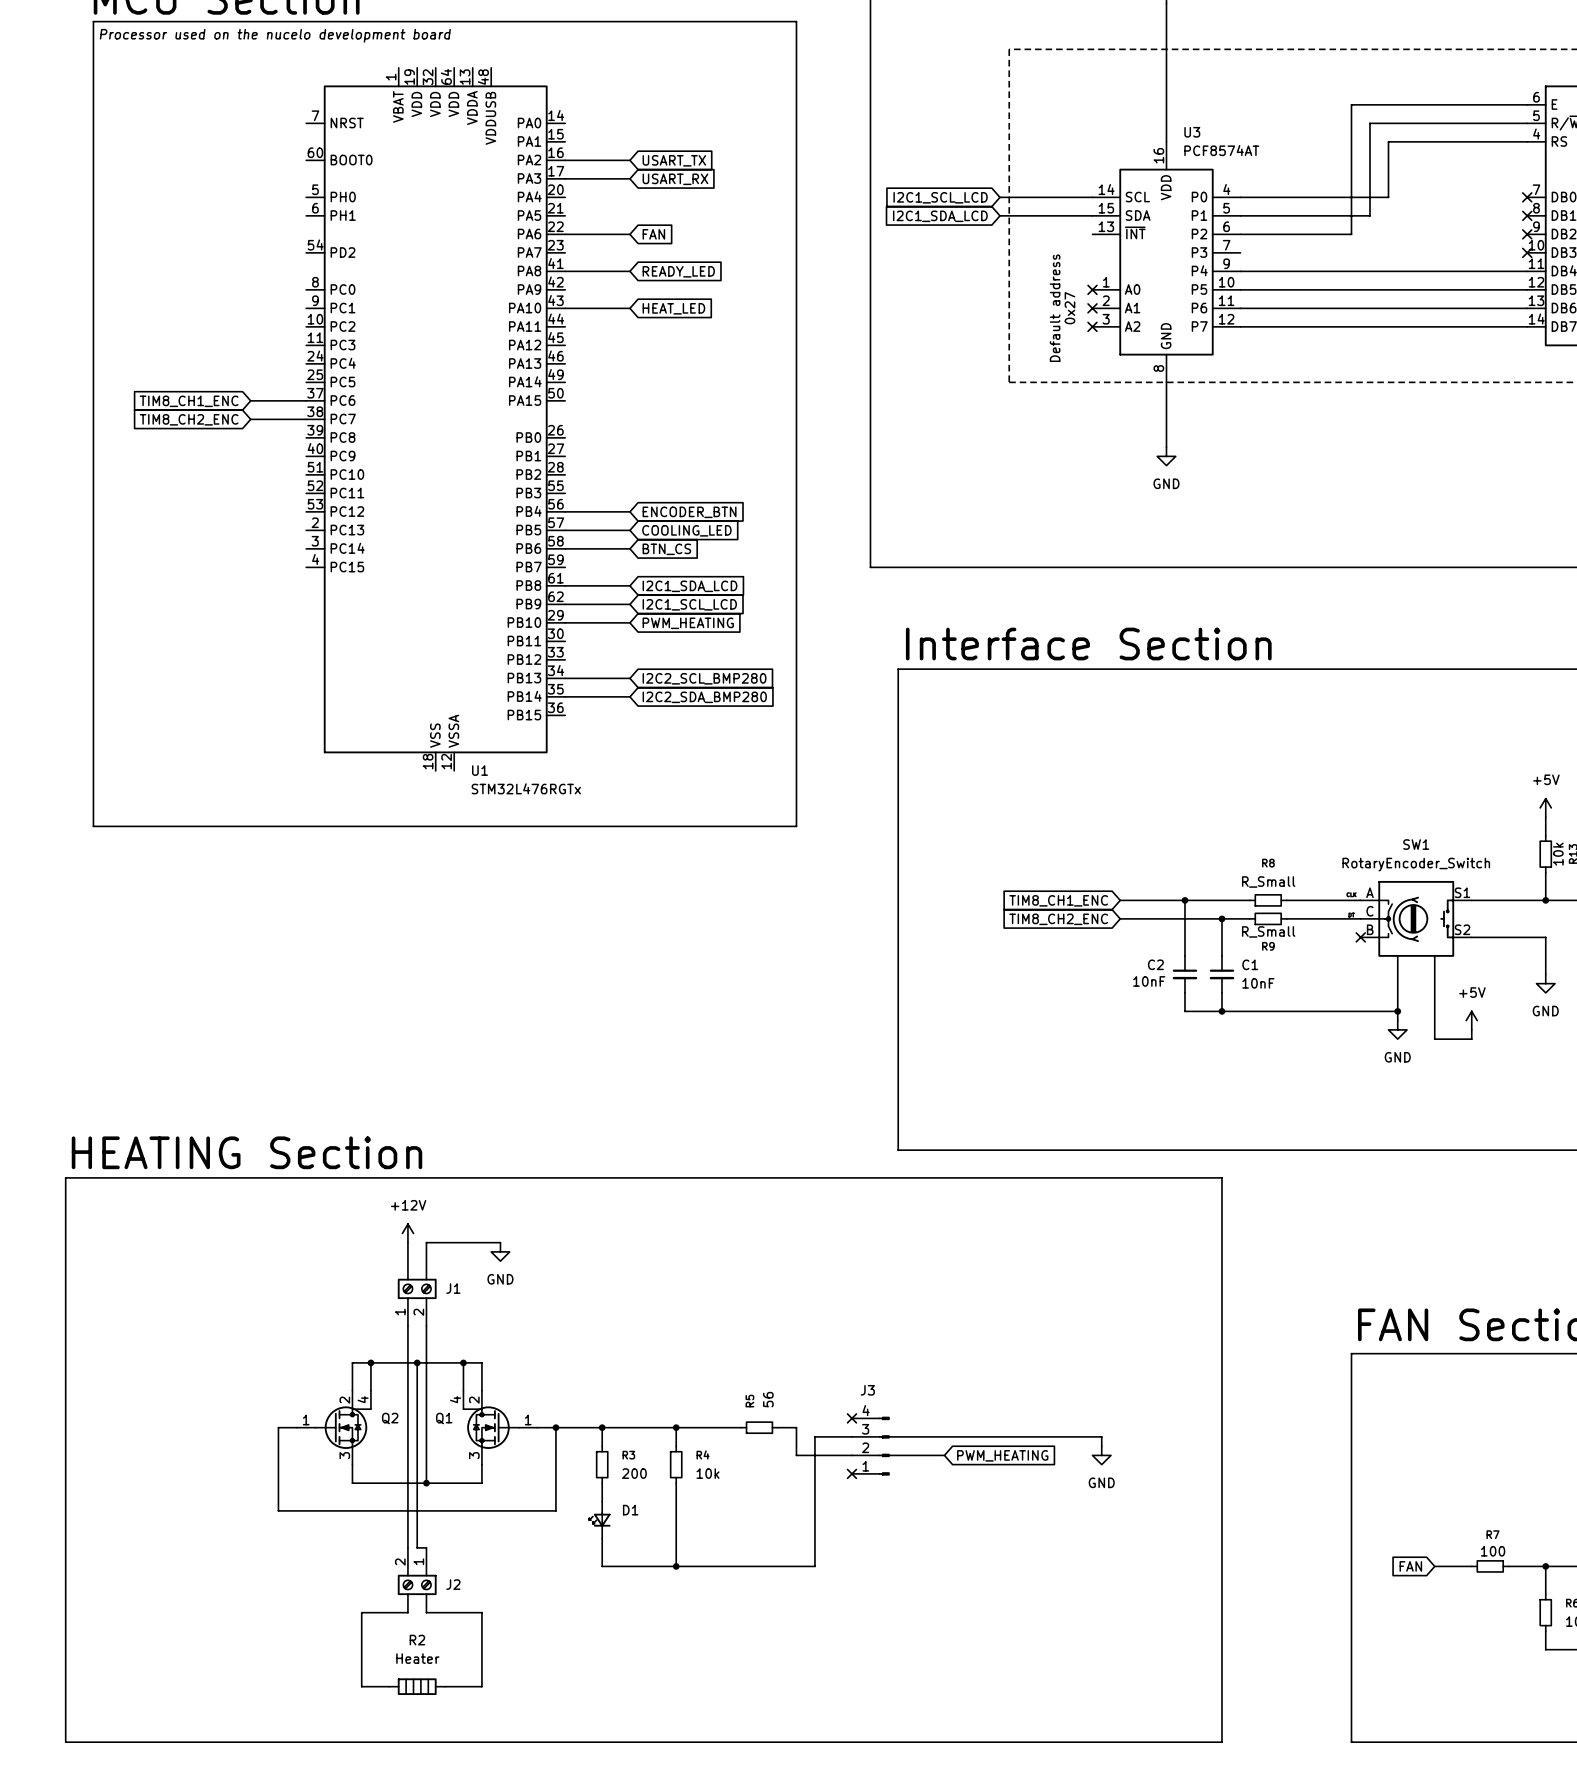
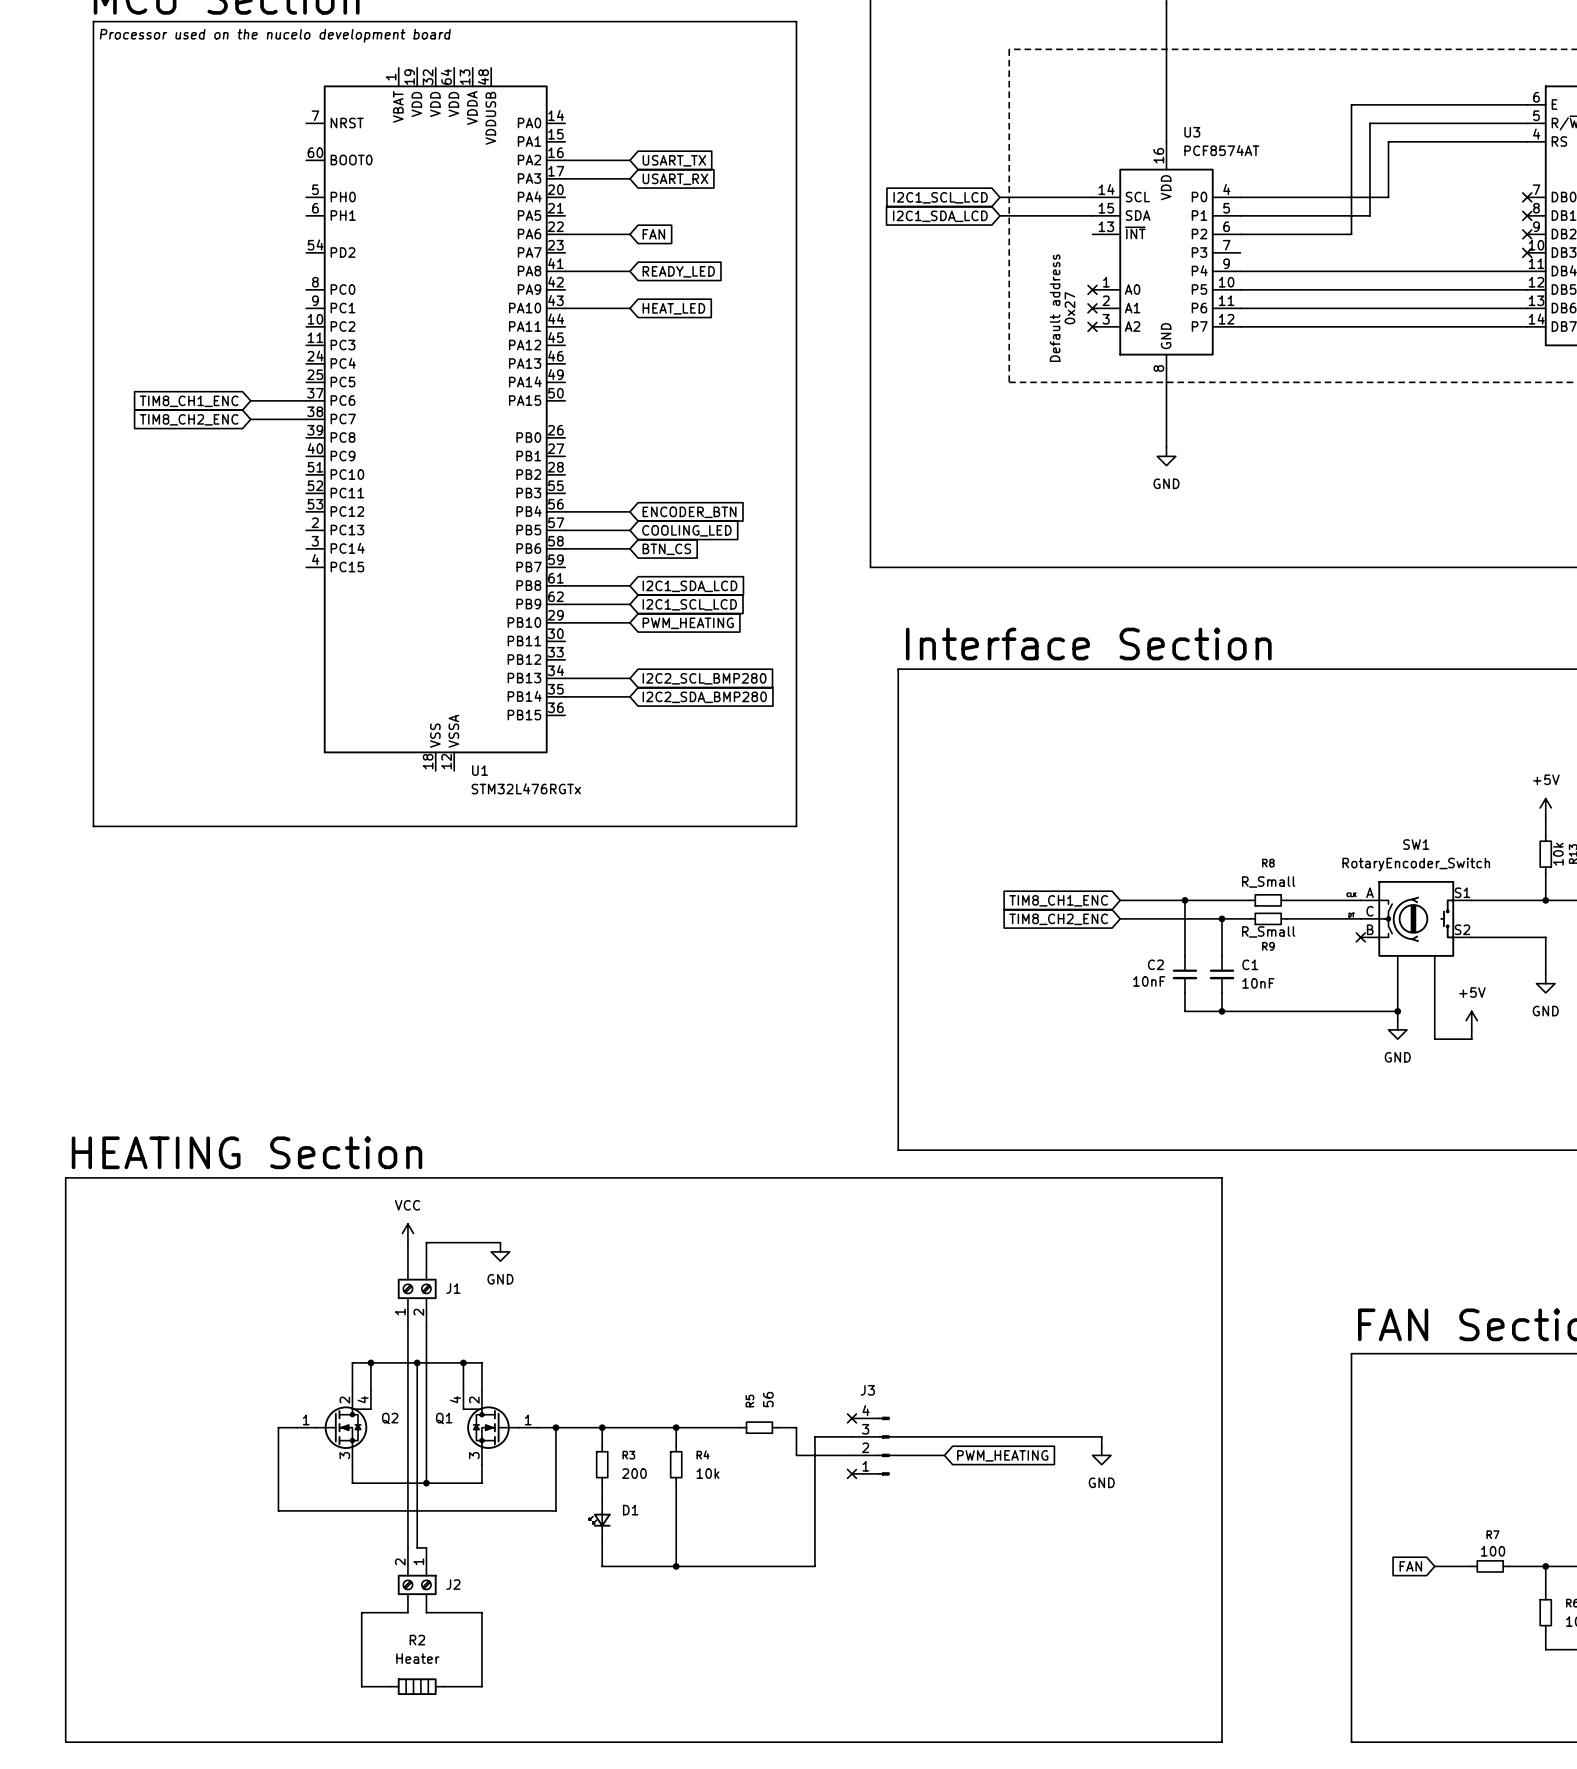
power symbol: +12V (407, 1233) -> VCC (407, 1233)

